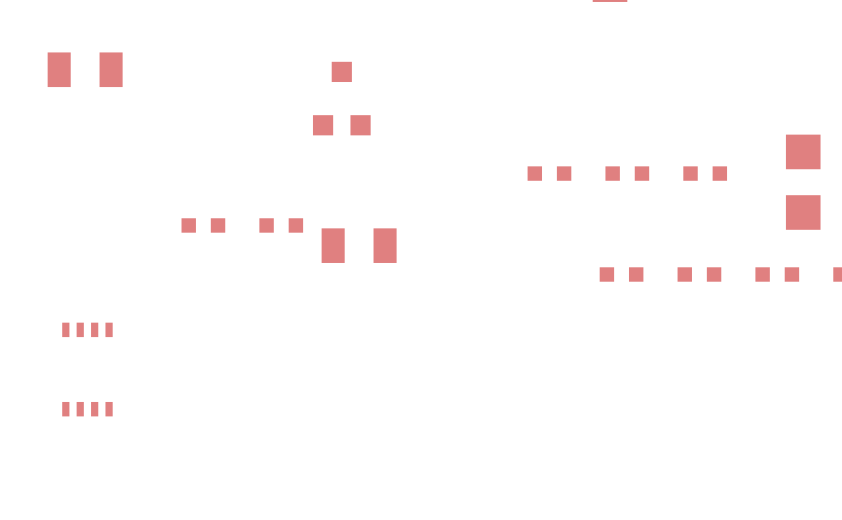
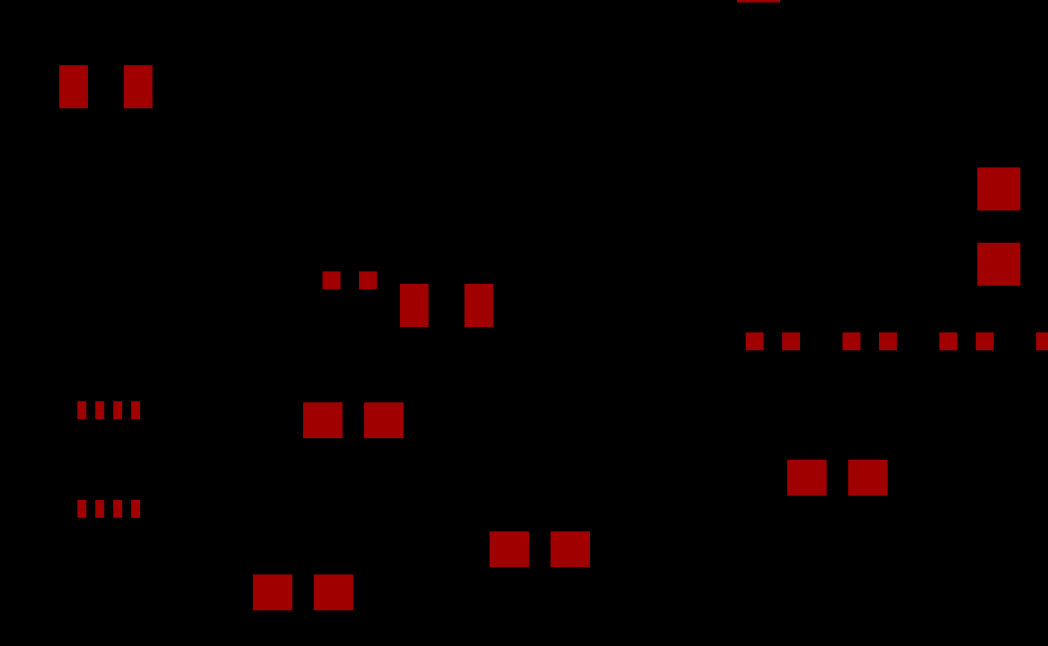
part: (341, 98) -> none
part: (549, 173) -> none
part: (627, 173) -> none
part: (705, 173) -> none
part: (203, 225) -> none
part: none -> (353, 420)
part: none -> (837, 477)
part: none -> (539, 549)
part: none -> (303, 592)

